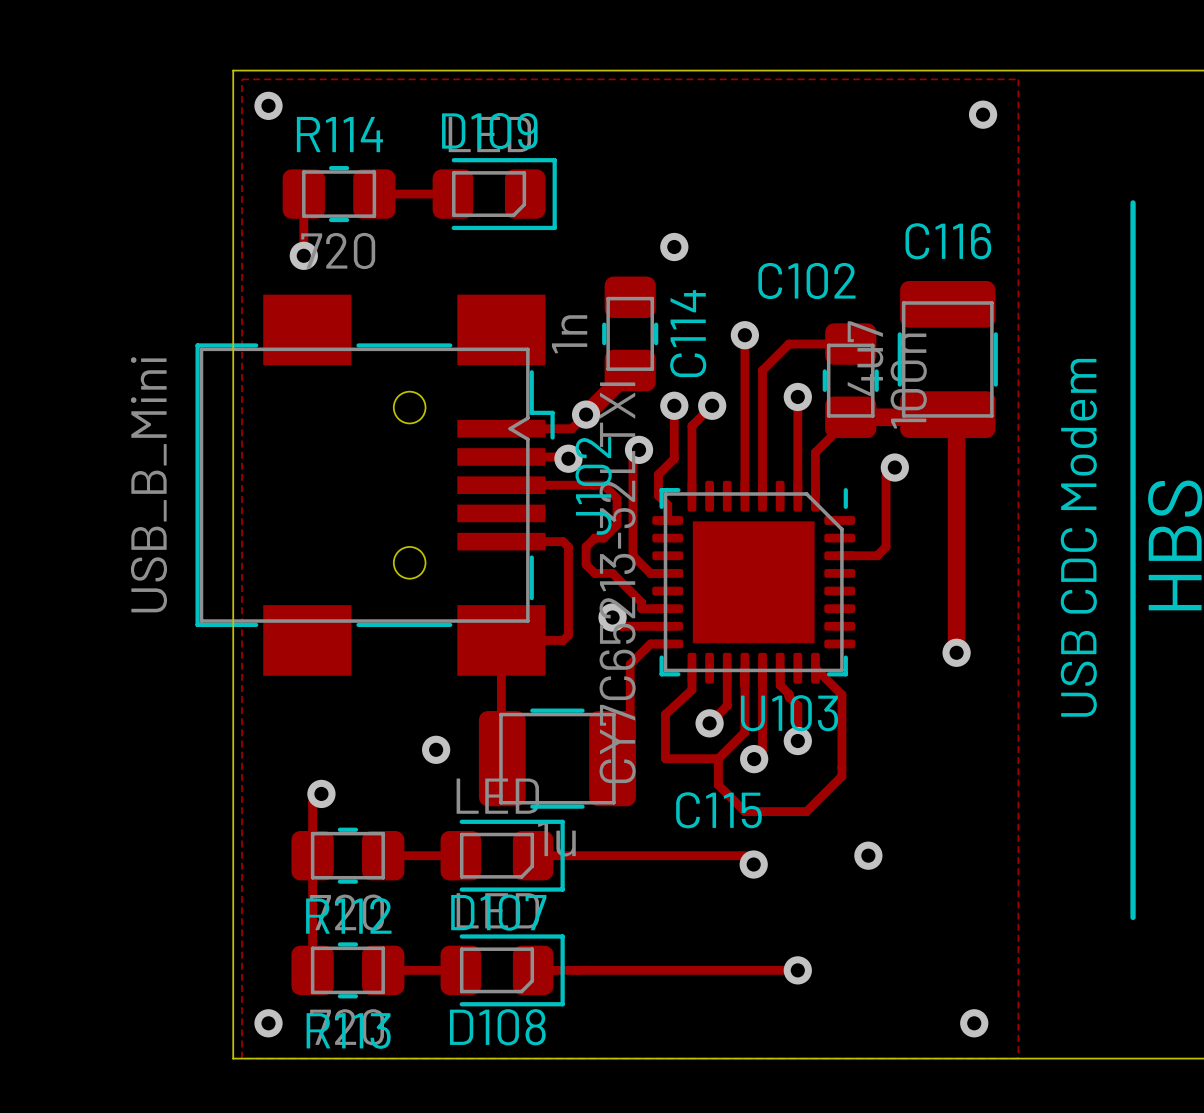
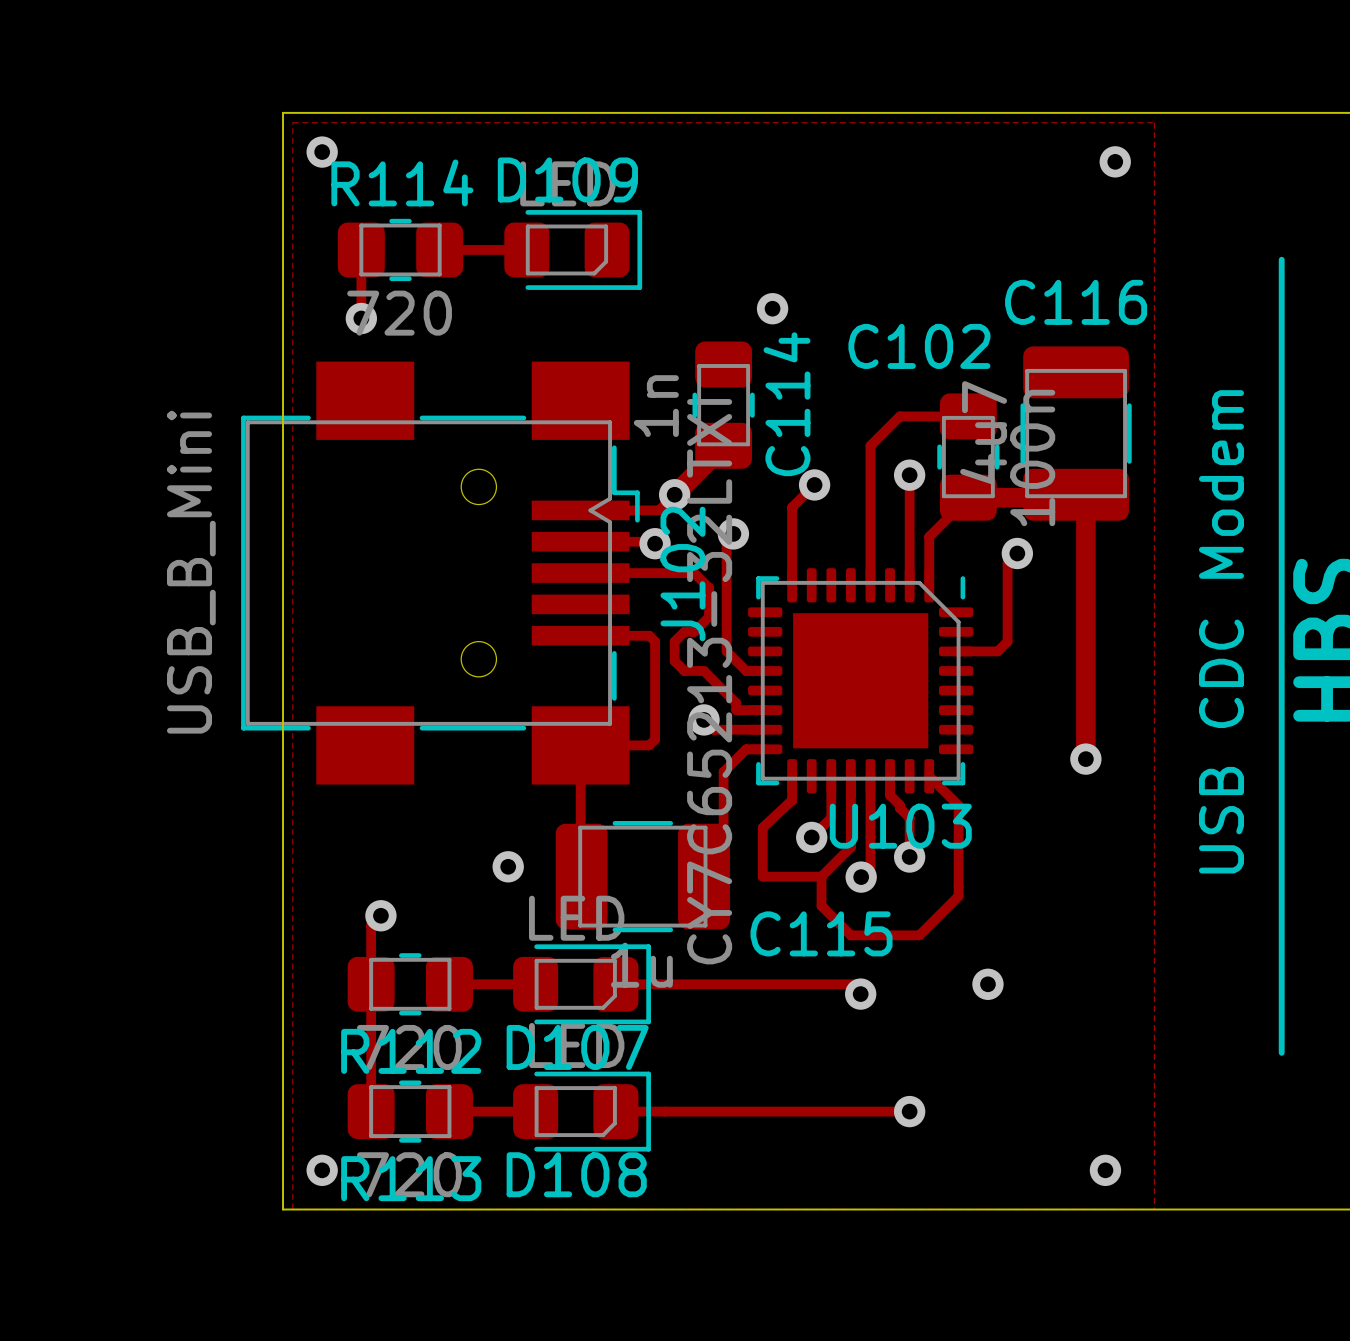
track: (744, 335) (744, 496) -> none
via: (744, 335) -> none
track: (674, 405) (674, 458) (658, 474) (658, 495) (667, 505) (667, 520) -> none
via: (674, 405) -> none

